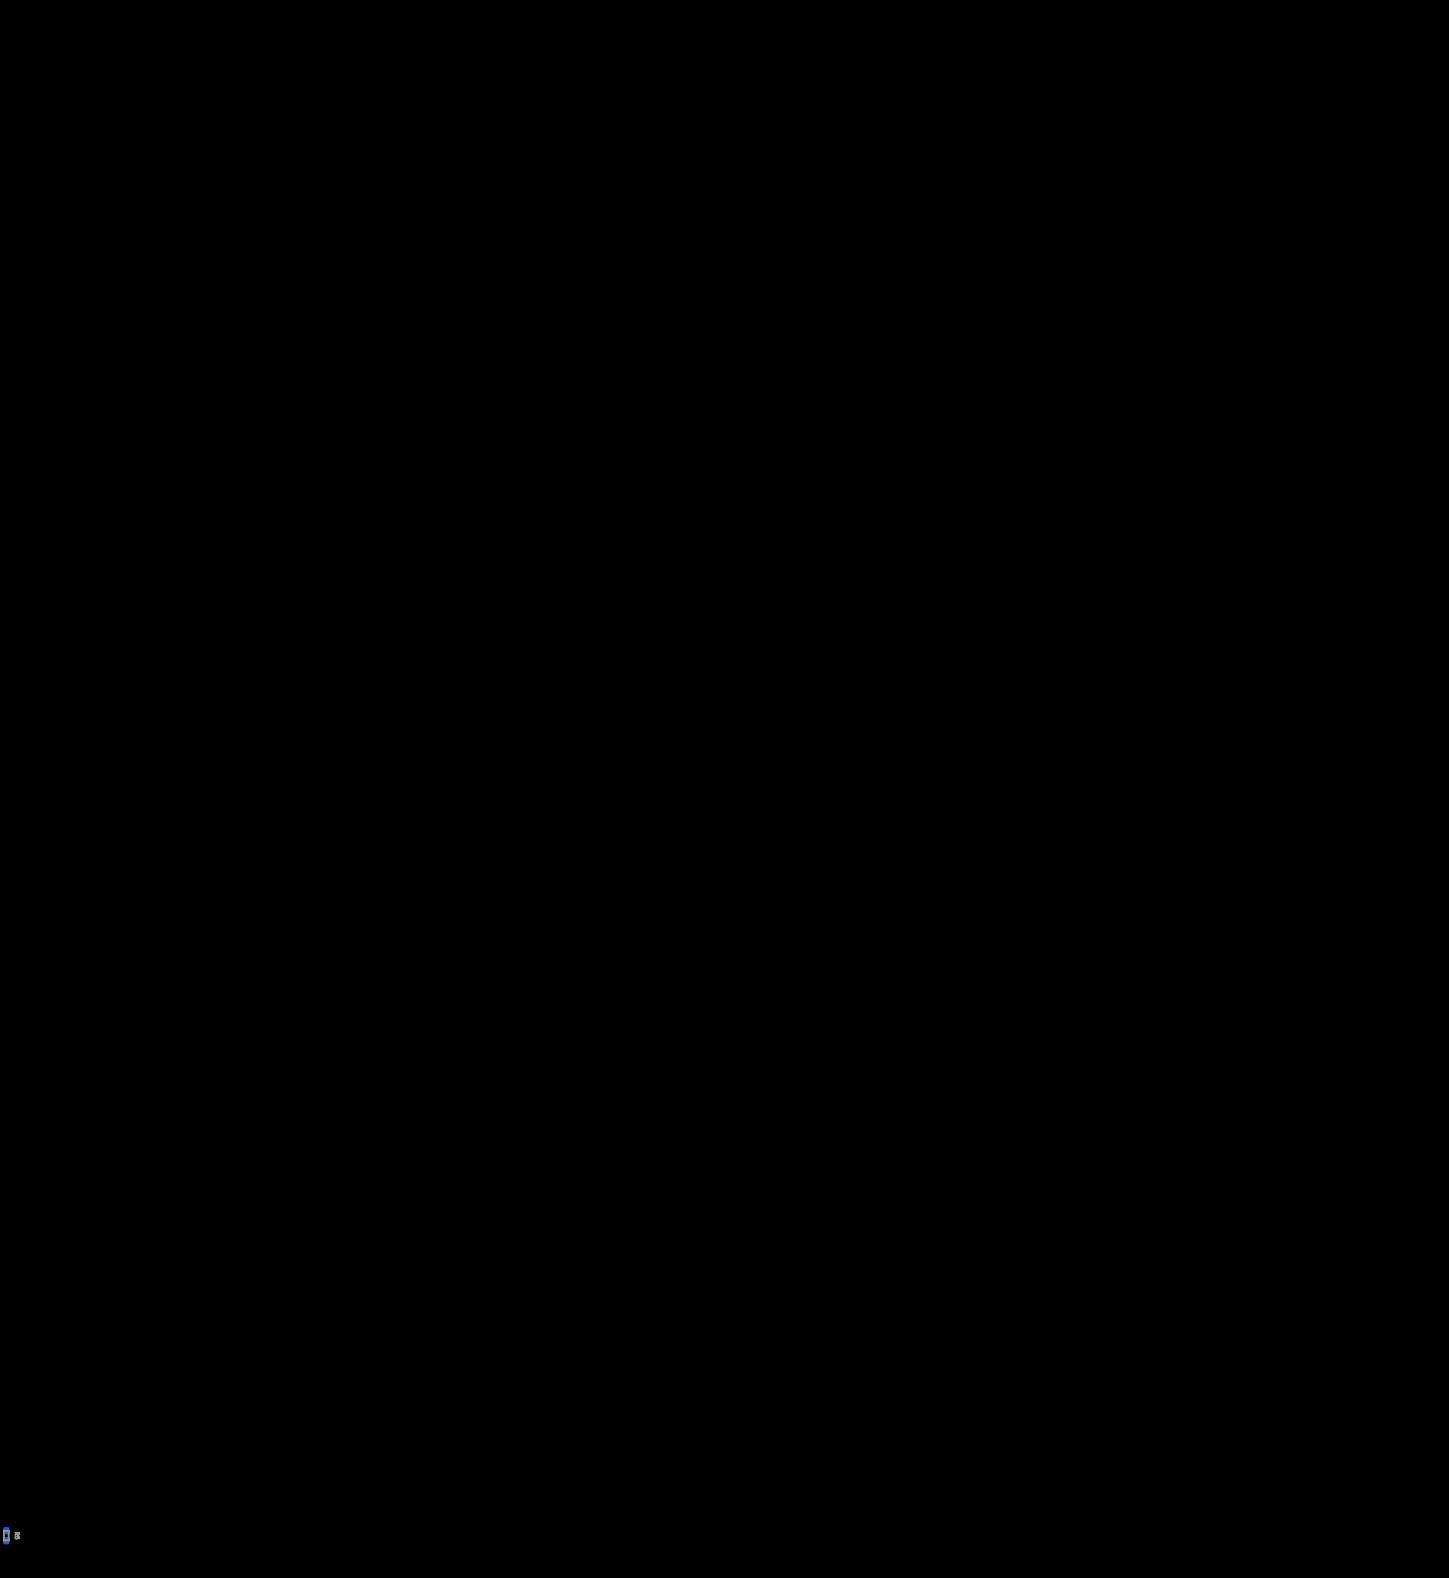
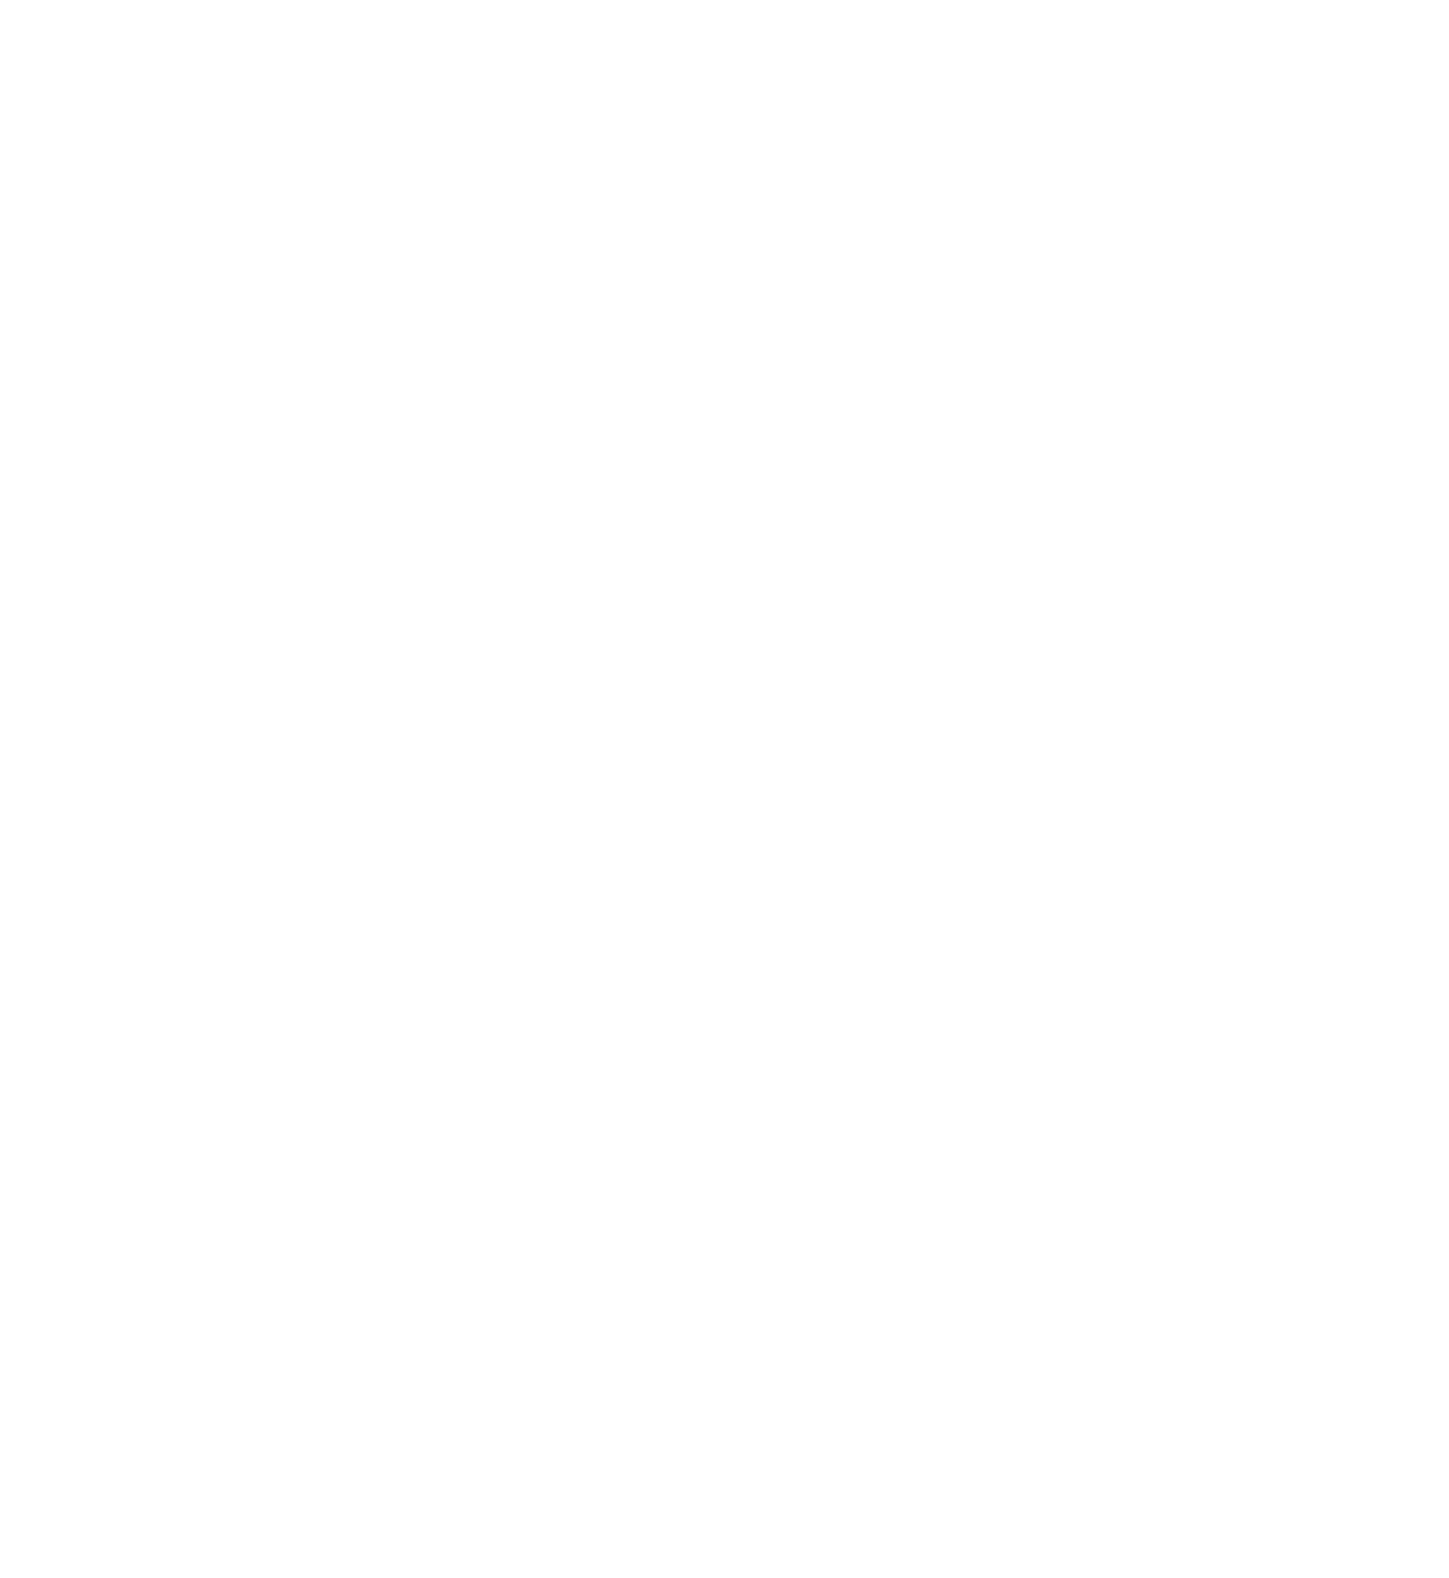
part: (6, 1535) -> none

